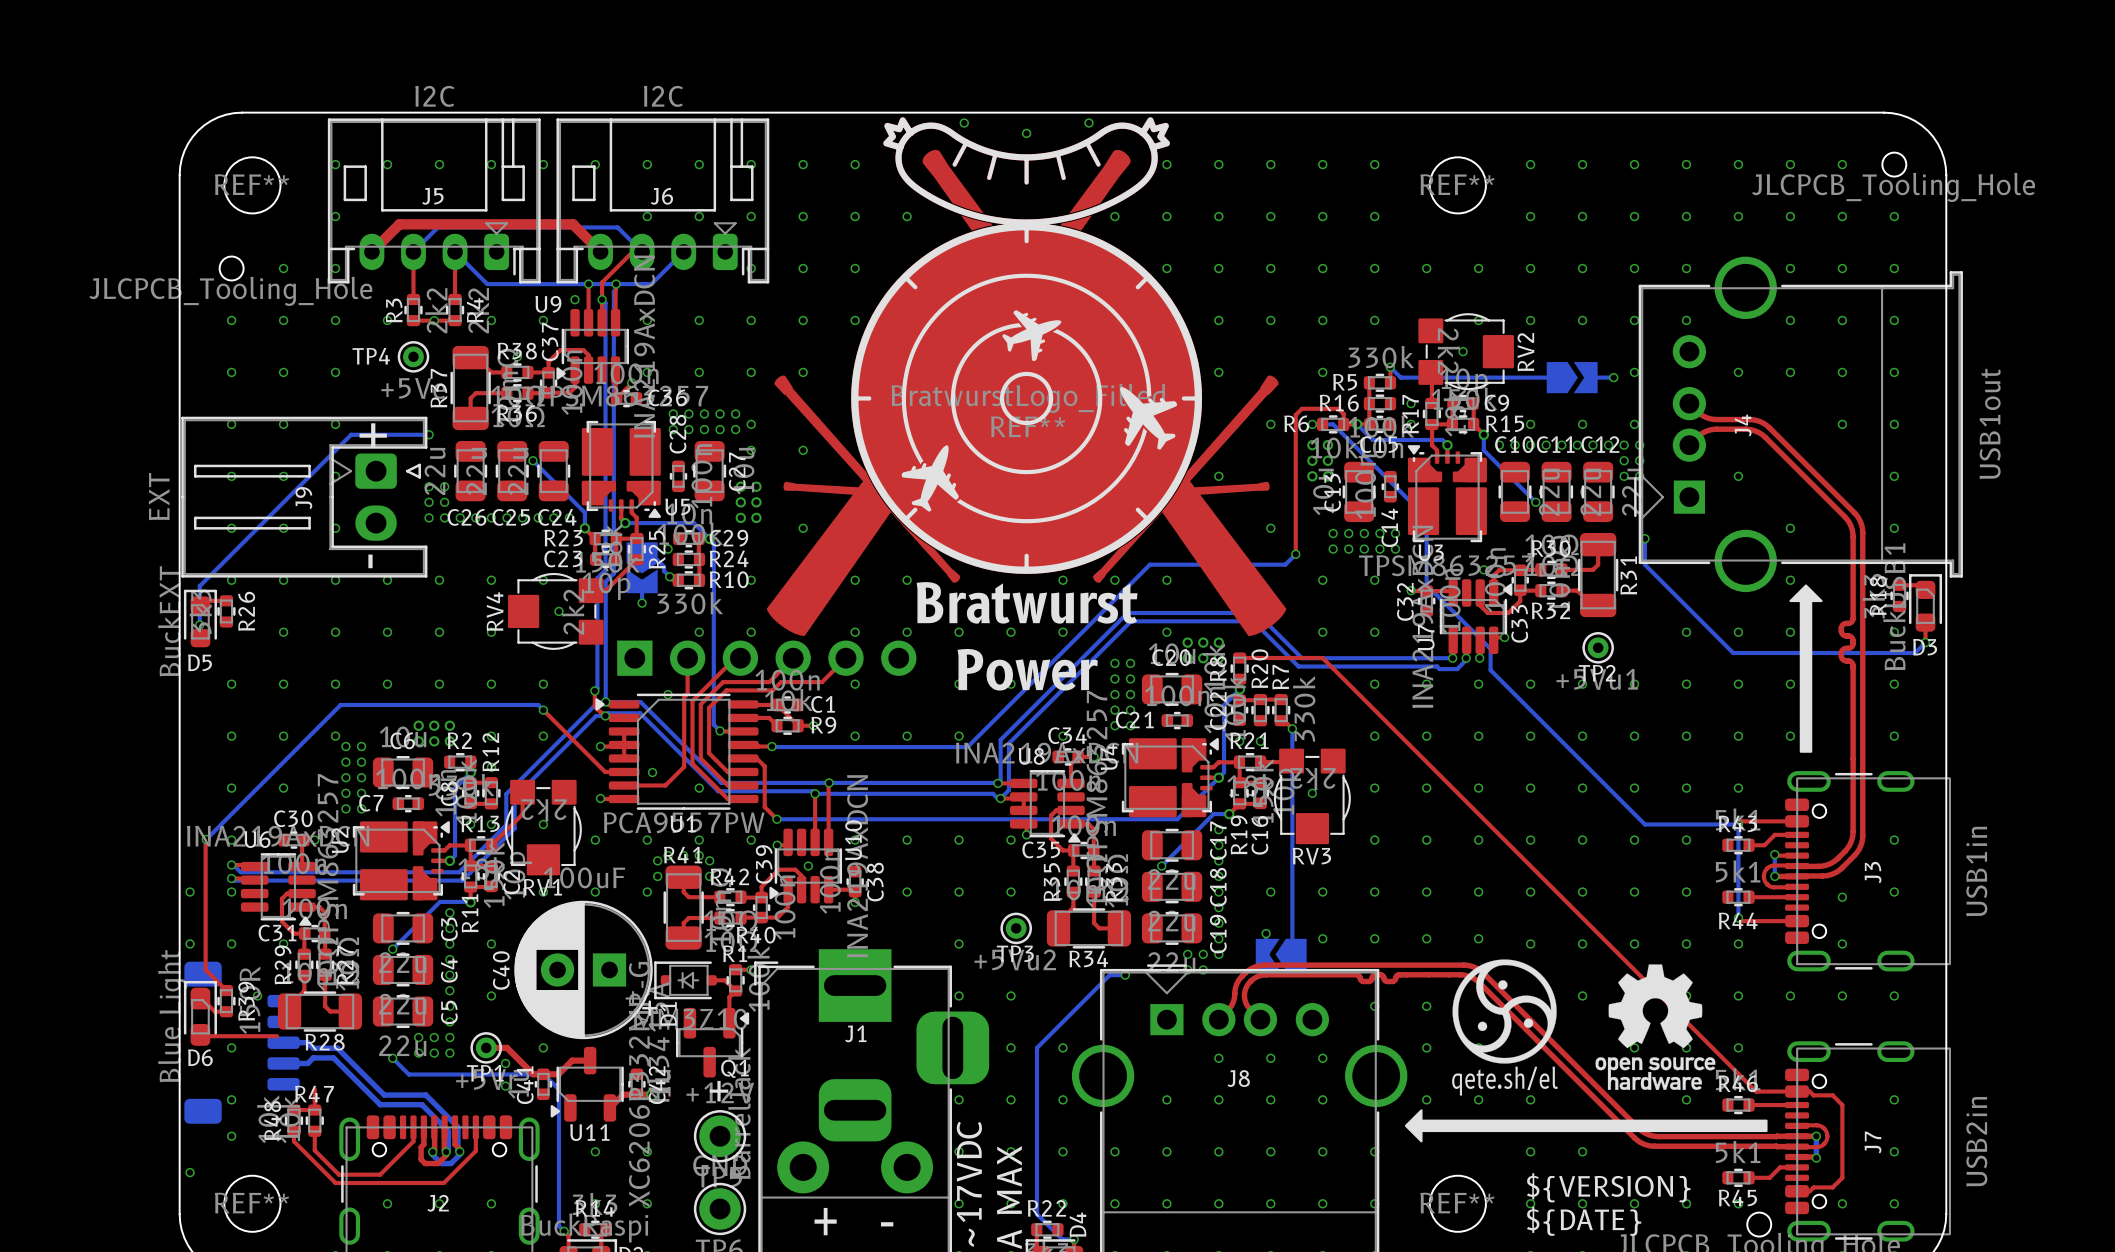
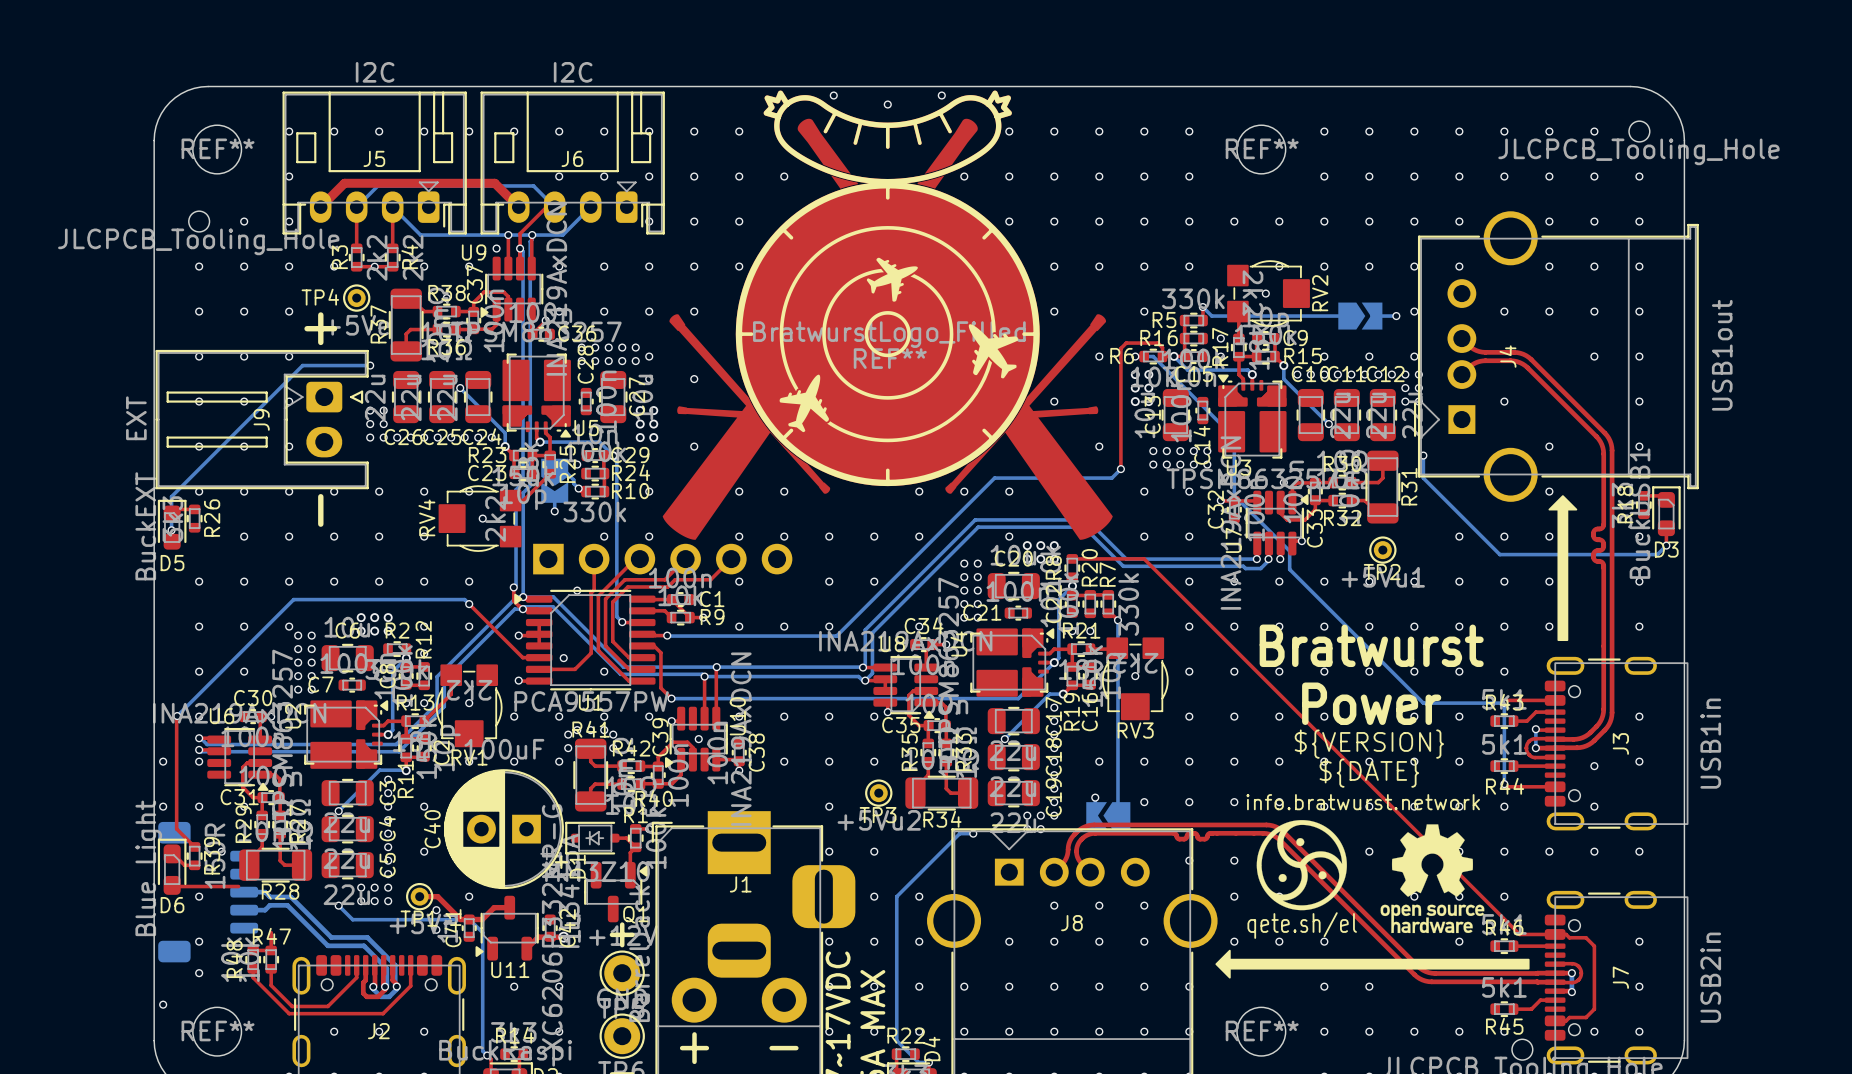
text: Bratwurst (1027, 602) -> none
text: Power (1027, 669) -> none
text: none -> Bratwurst (1371, 645)
text: none -> Power (1371, 703)
text: none -> info.bratwurst.network (1363, 802)
text position: ${VERSION} (1608, 1187) -> ${VERSION} (1369, 744)
text position: ${DATE} (1584, 1221) -> ${DATE} (1369, 773)

